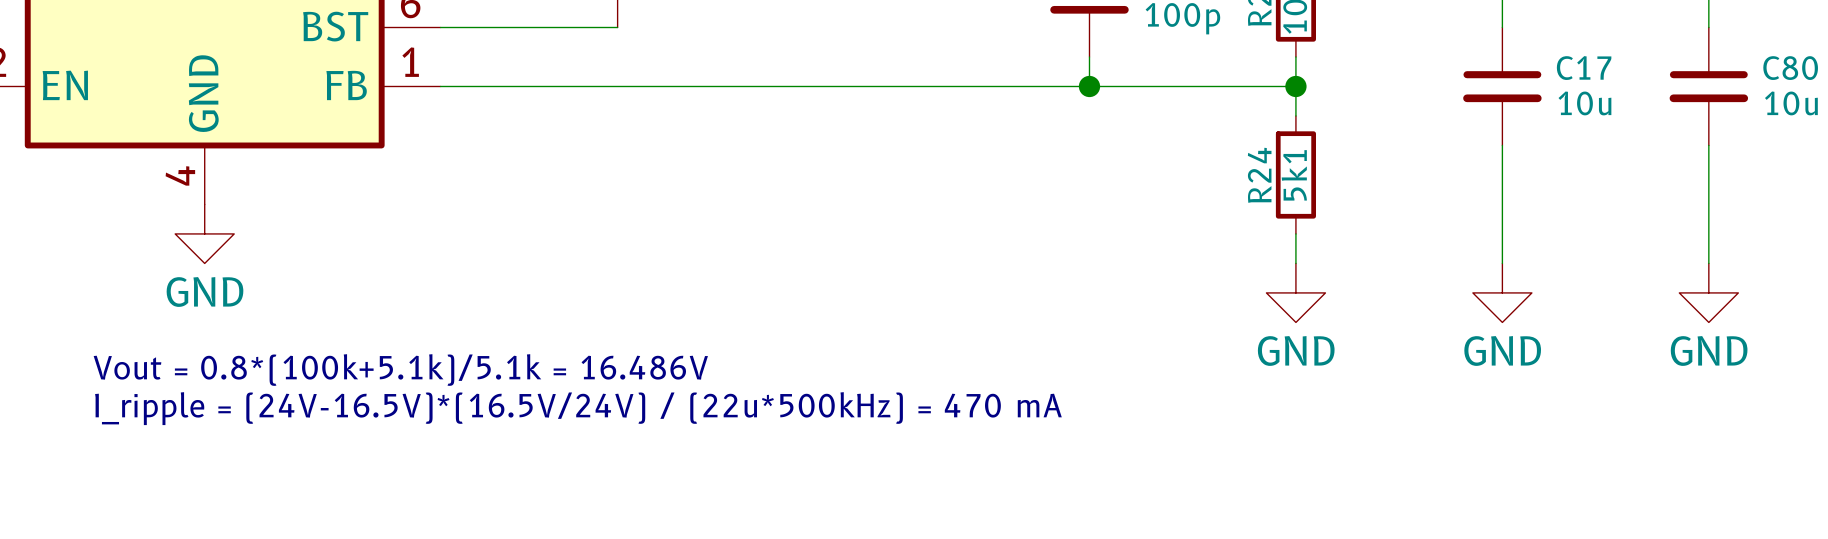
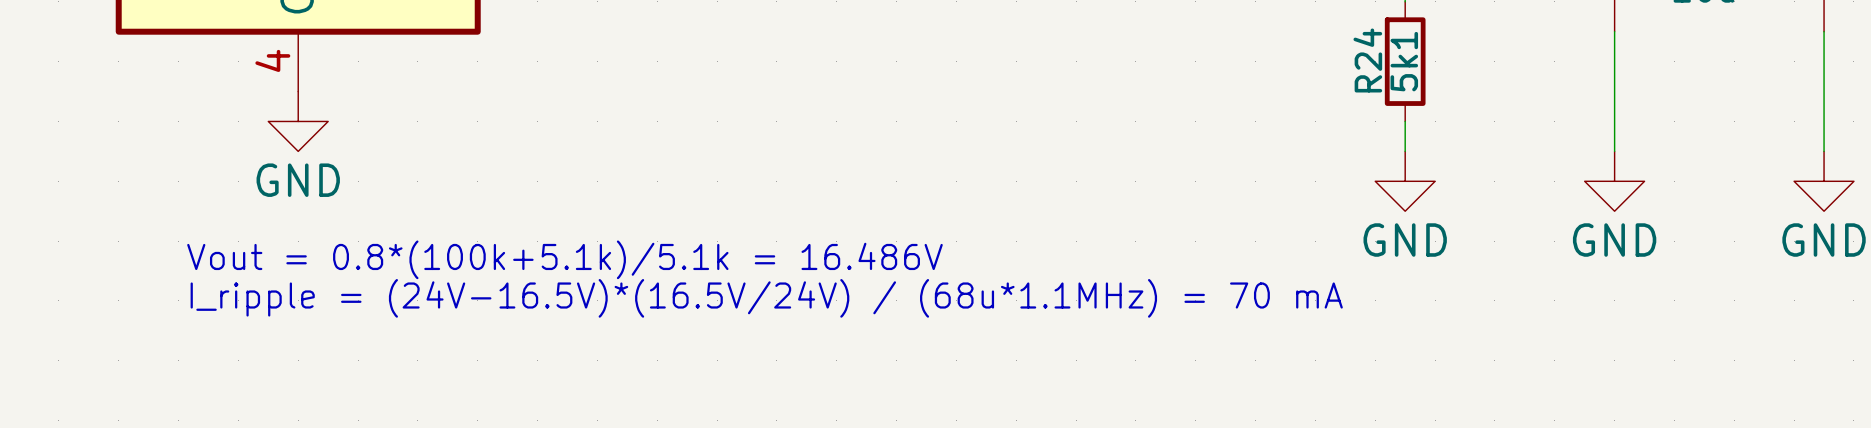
text: I_ripple = (24V-16.5V)*(16.5V/24V) / (22u*500kHz) = 470 mA (578, 408) -> I_ripple = (24V-16.5V)*(16.5V/24V) / (68u*1.1MHz) = 70 mA (766, 298)

